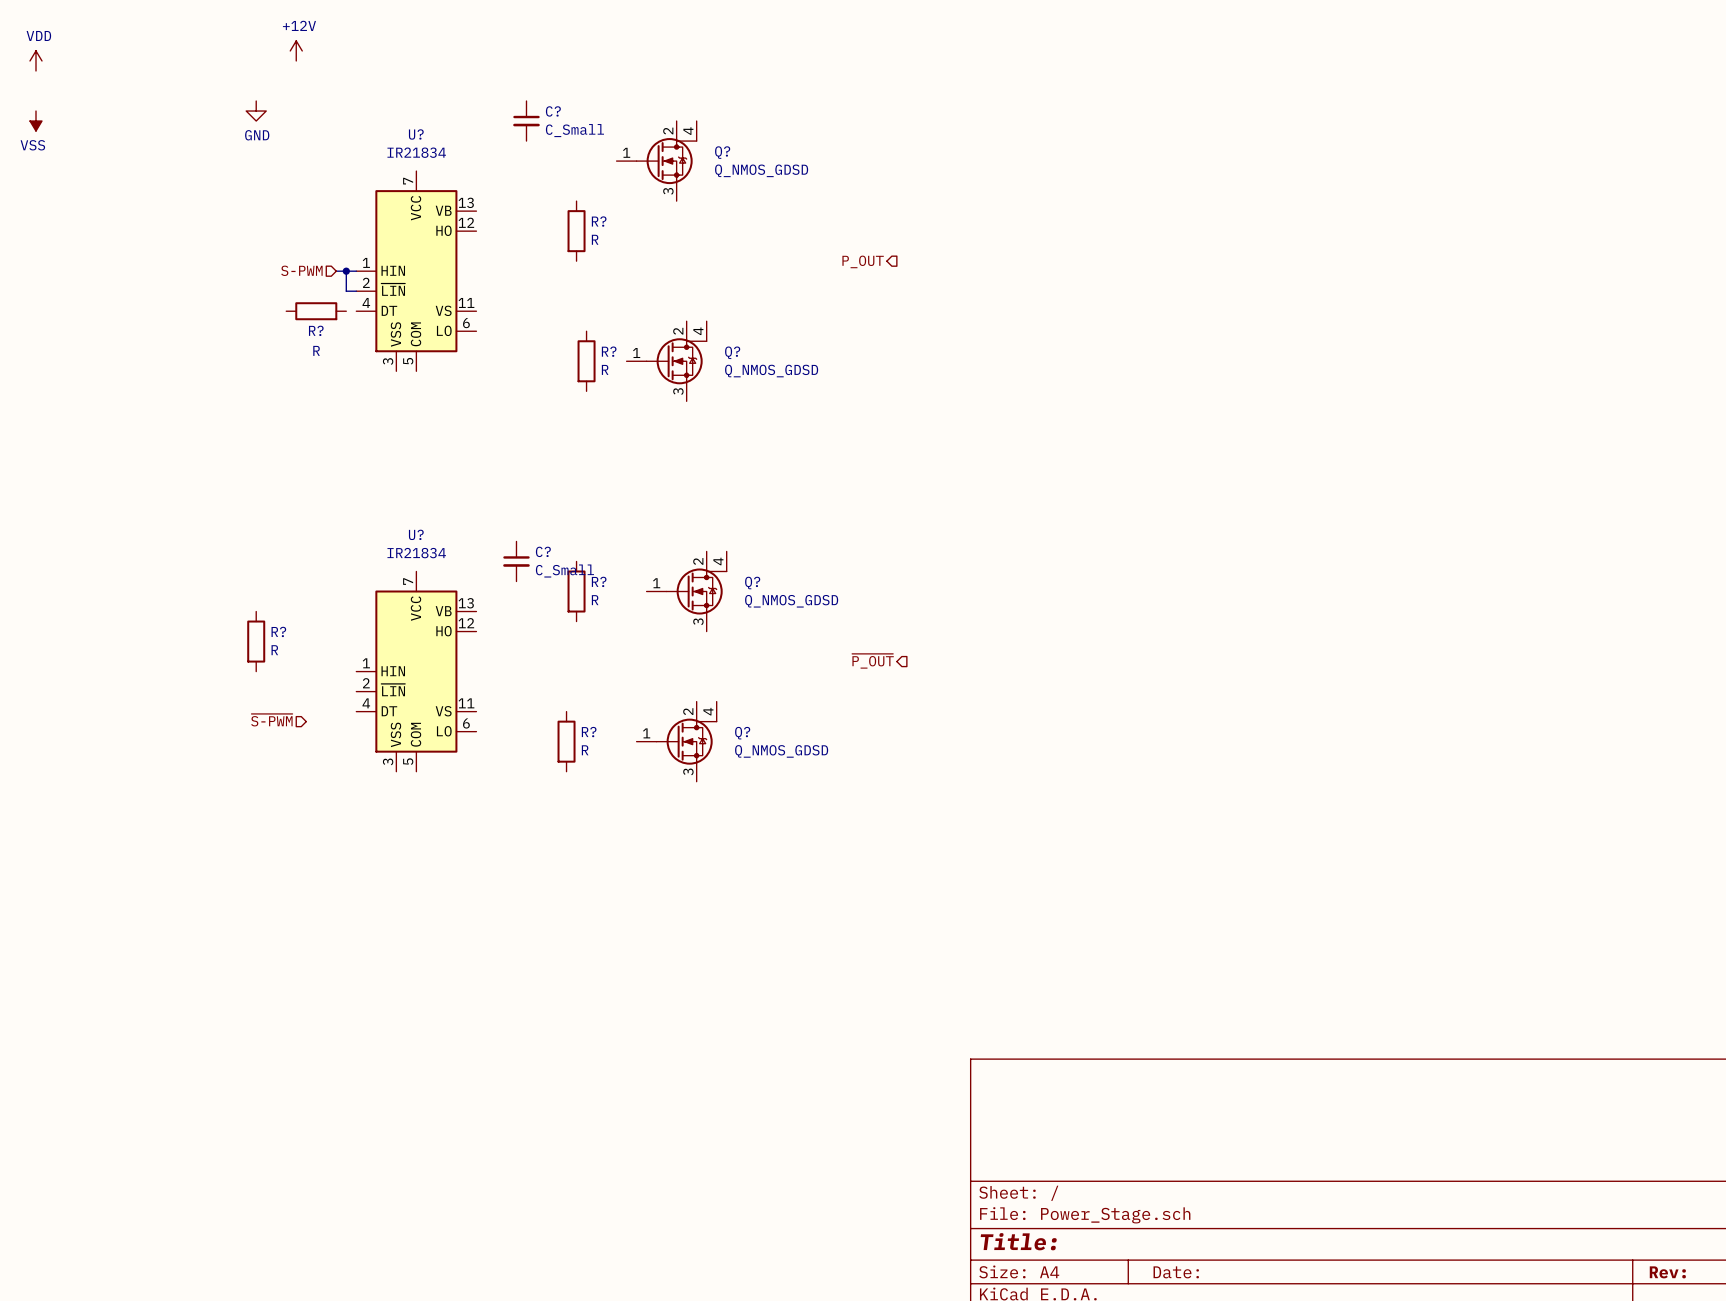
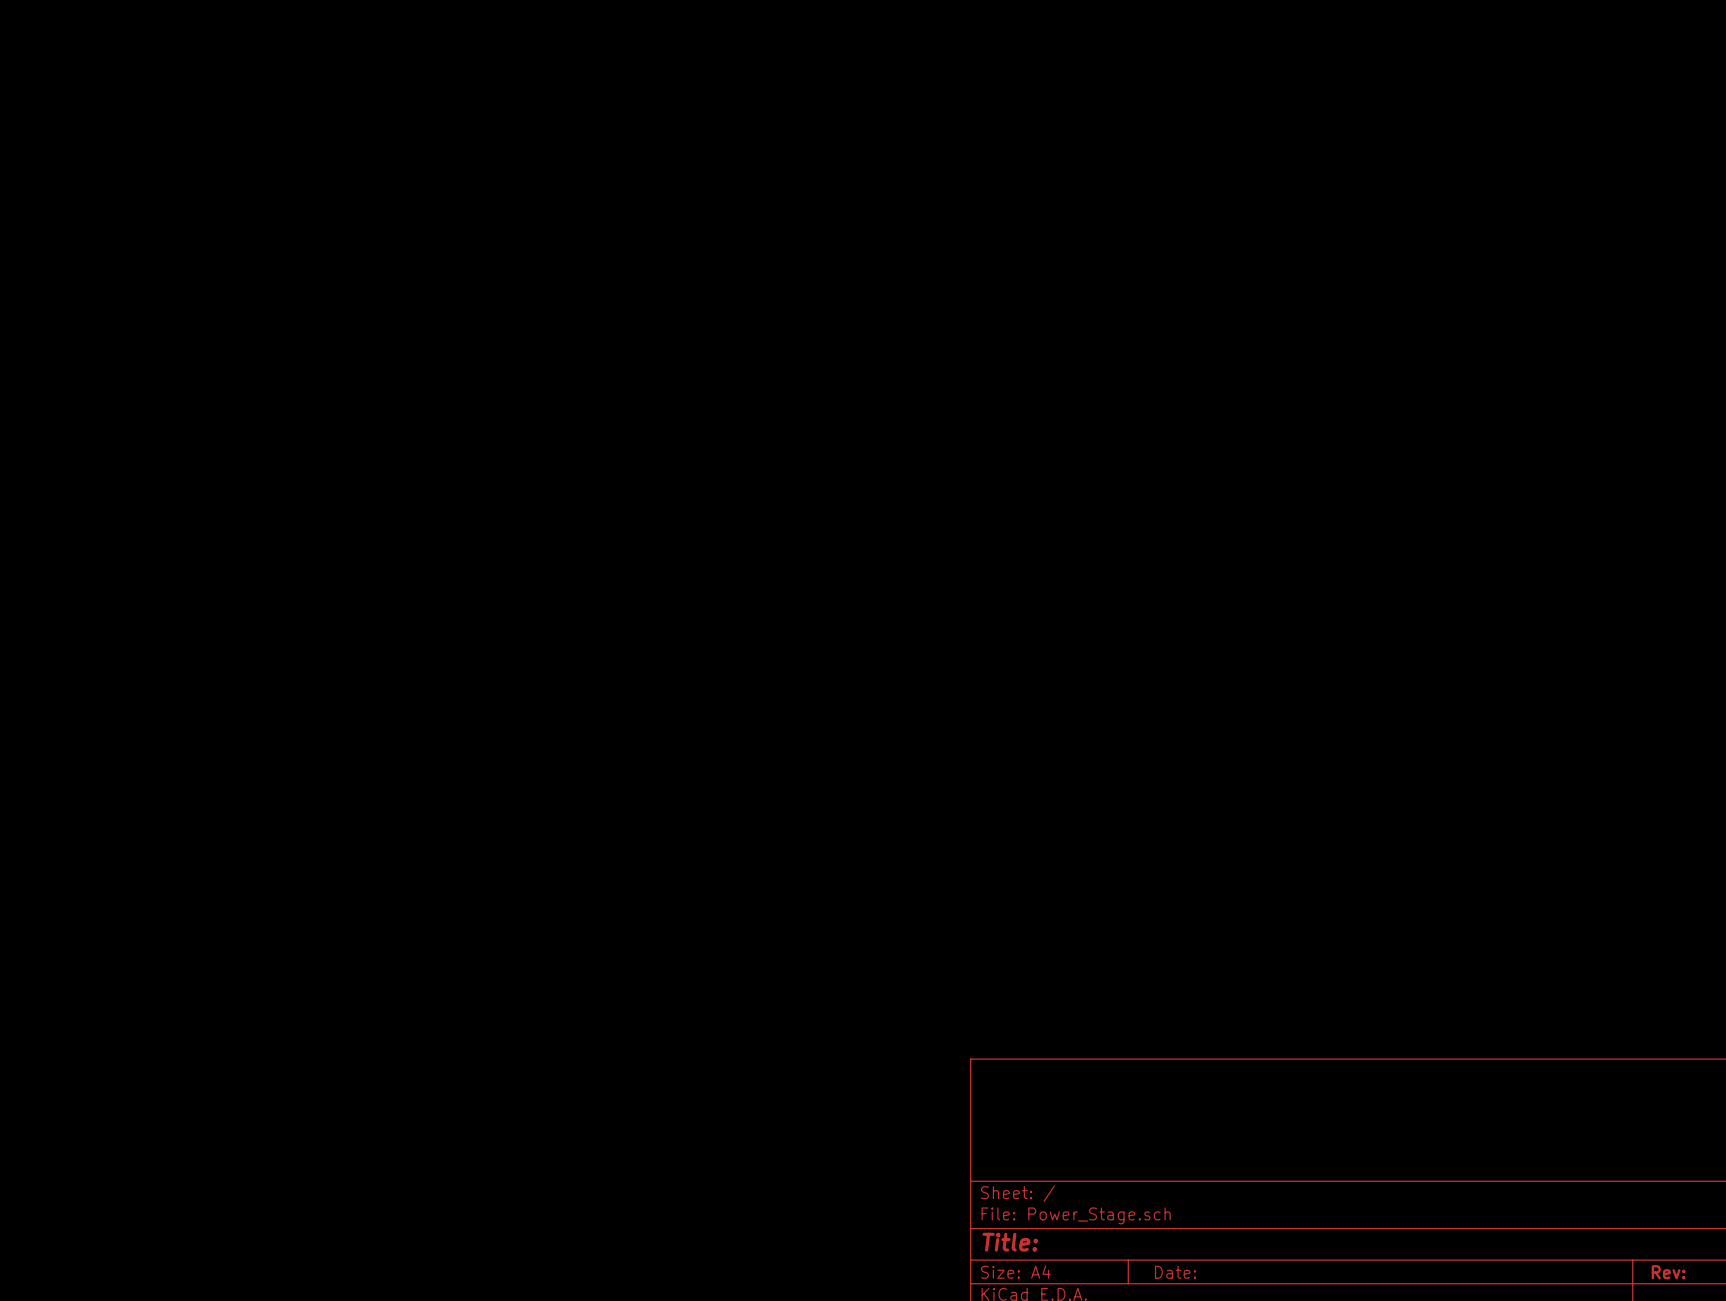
power symbol: +12V (296, 50) -> none
power symbol: VDD (36, 60) -> none
power symbol: GND (256, 111) -> none
power symbol: VSS (36, 121) -> none
C?: C_Small (526, 121) -> none
Q?: Q_NMOS_GDSD (656, 161) -> none
R?: R (576, 231) -> none
hierarchical label: P_OUT (863, 261) -> none
hierarchical label: S-PWM (301, 270) -> none
wire: (336, 271) (356, 271) -> none
wire: (346, 271) (346, 291) (356, 291) -> none
junction: (346, 271) -> none
U?: IR21834 (416, 271) -> none
R?: R (316, 311) -> none
R?: R (586, 361) -> none
Q?: Q_NMOS_GDSD (666, 361) -> none
C?: C_Small (516, 561) -> none
R?: R (576, 591) -> none
Q?: Q_NMOS_GDSD (686, 591) -> none
R?: R (256, 641) -> none
hierarchical label: ~{P_OUT} (872, 661) -> none
U?: IR21834 (416, 671) -> none
hierarchical label: ~{S-PWM} (271, 720) -> none
R?: R (566, 741) -> none
Q?: Q_NMOS_GDSD (676, 741) -> none

